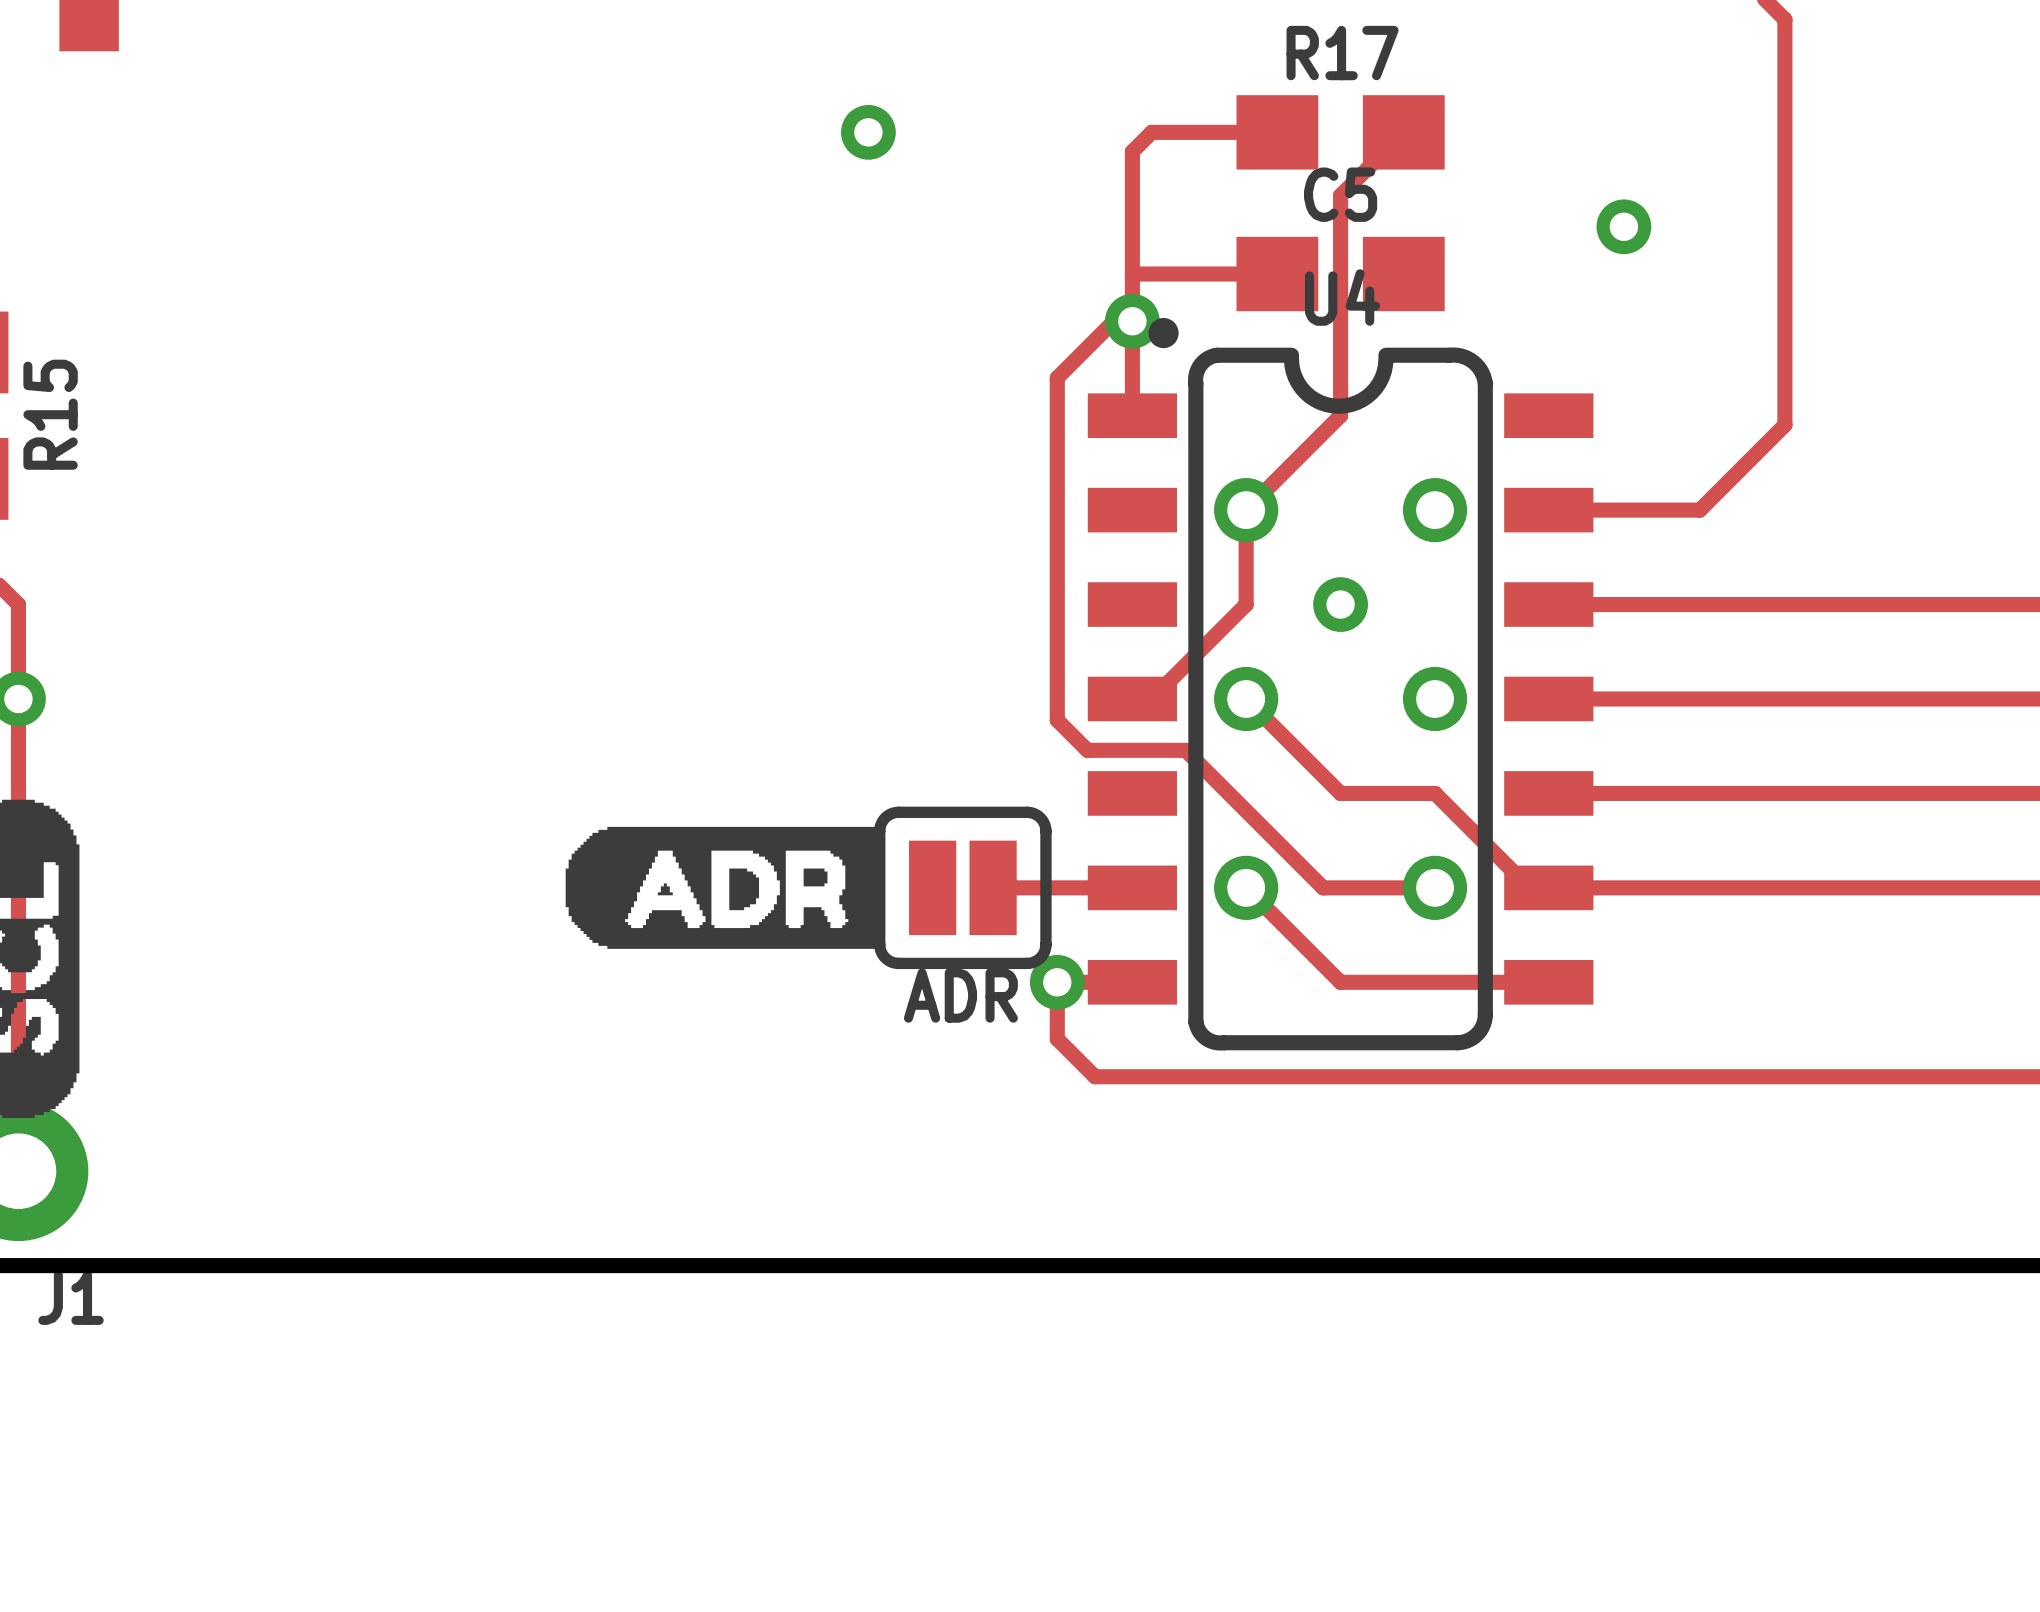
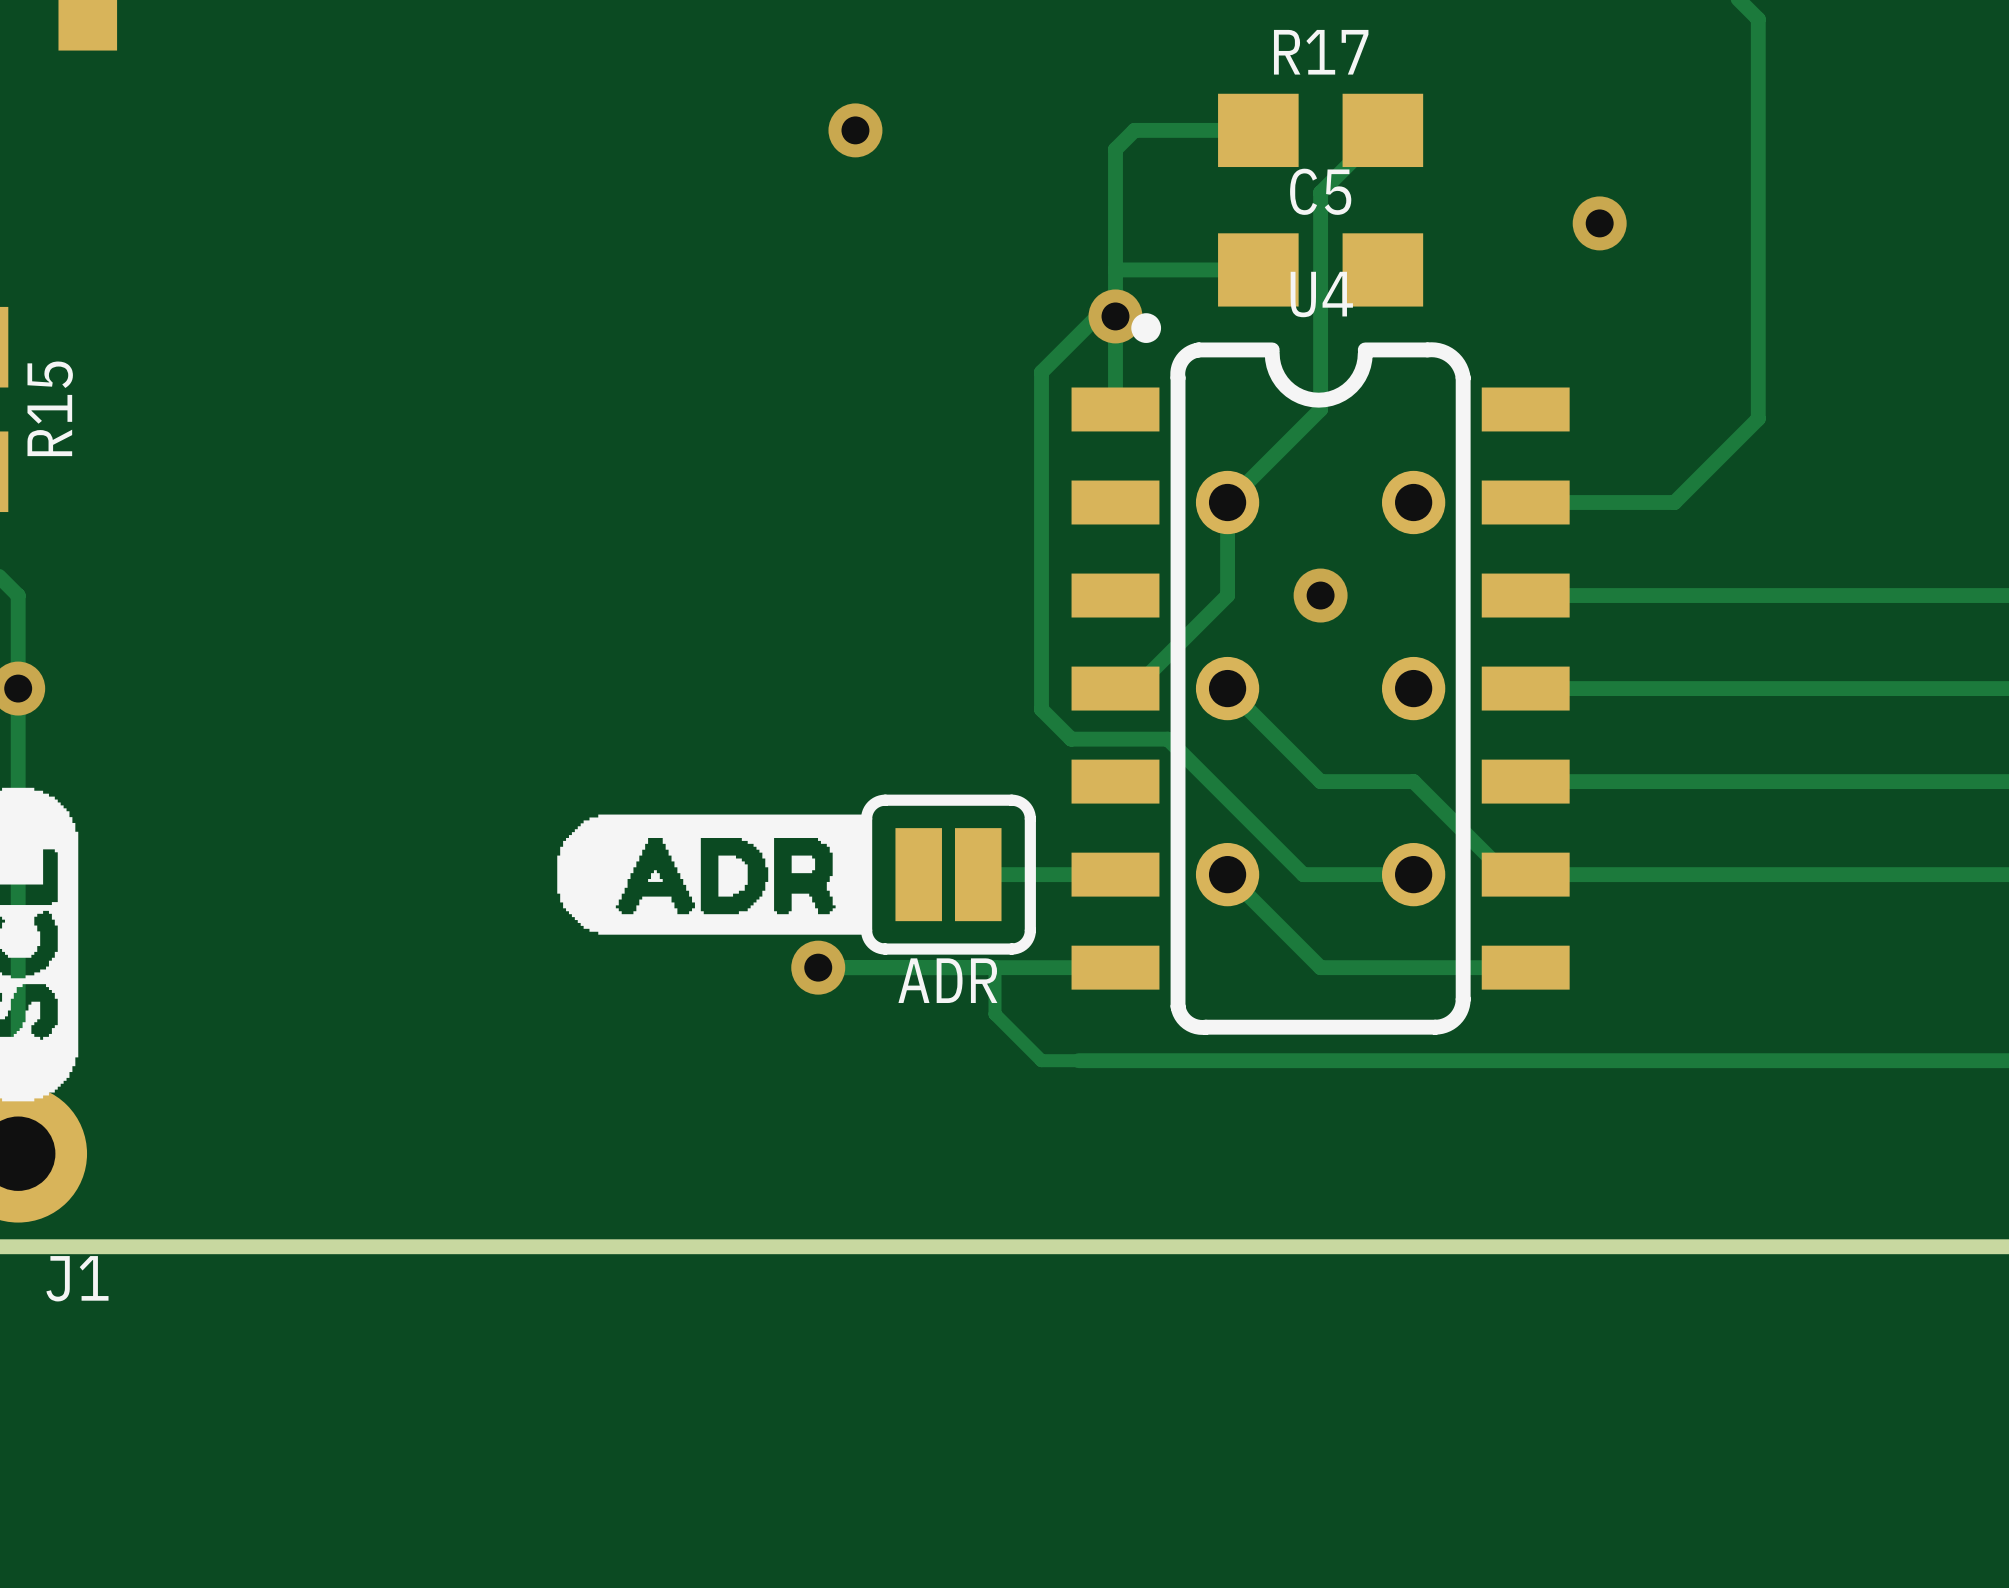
track: none -> (818, 967) (1041, 967)
track: (1057, 982) (1057, 1038) (1095, 1076) -> (994, 967) (994, 1014) (1041, 1060) (1078, 1060)
via position: (1057, 982) -> (818, 967)

